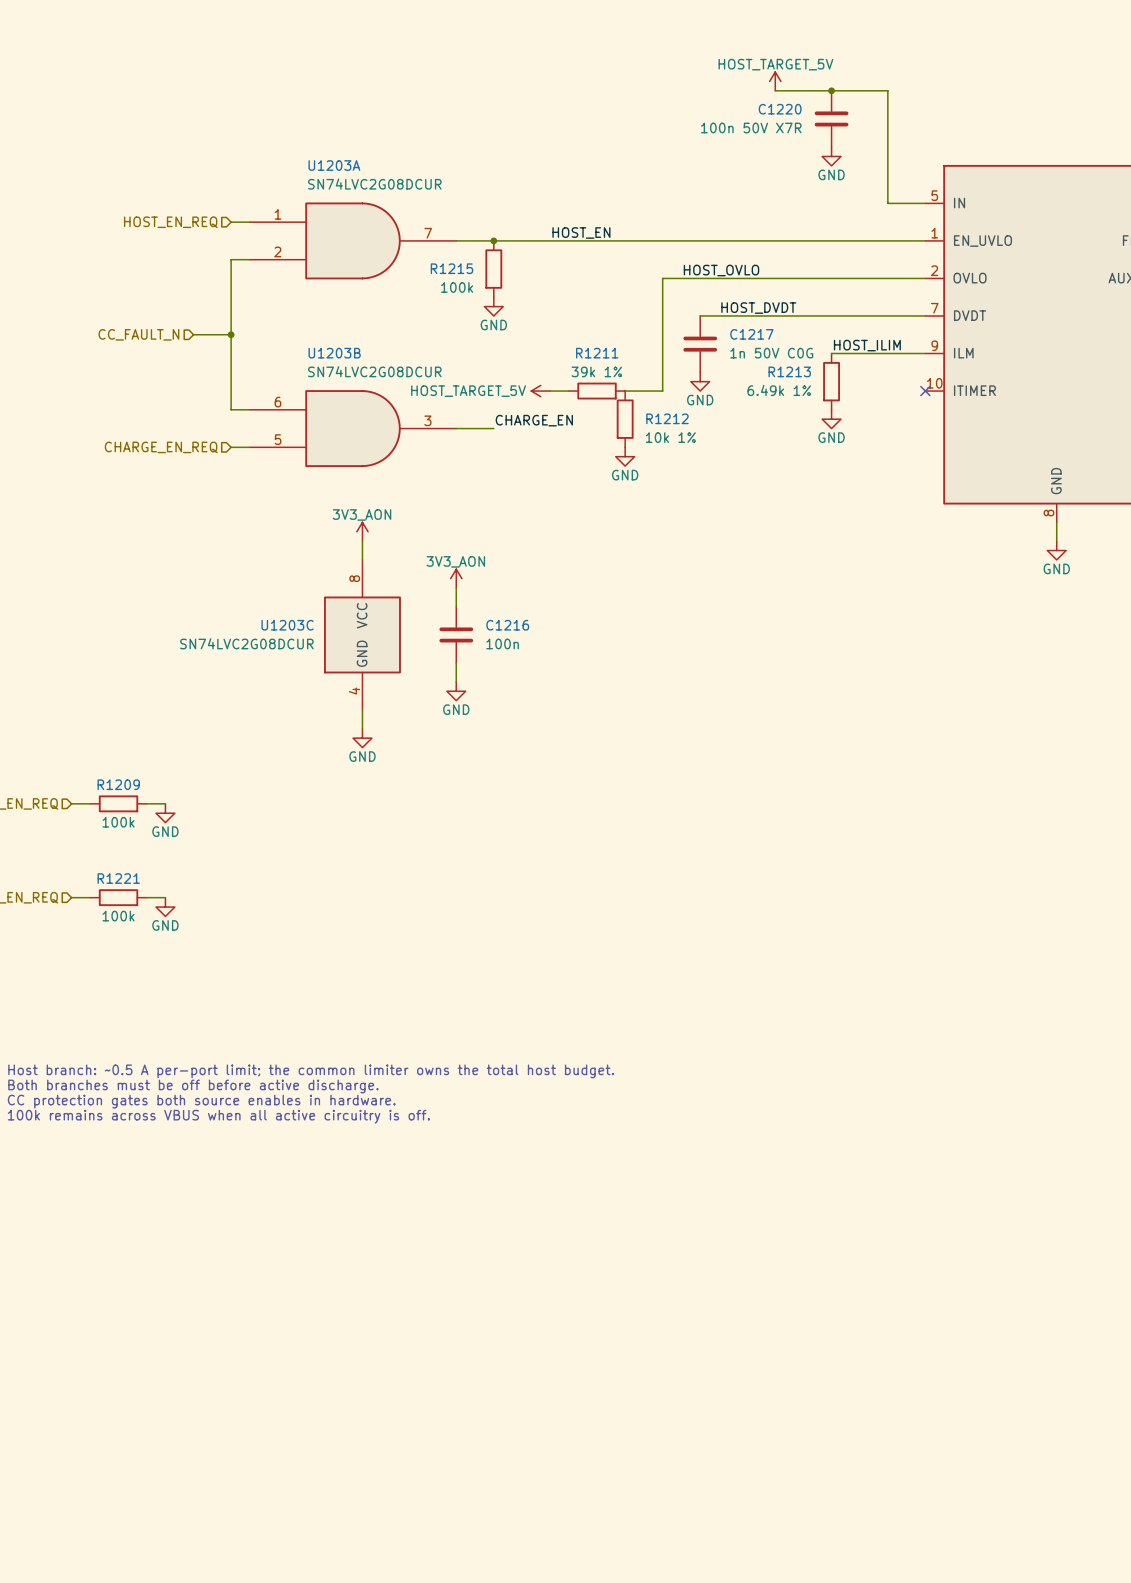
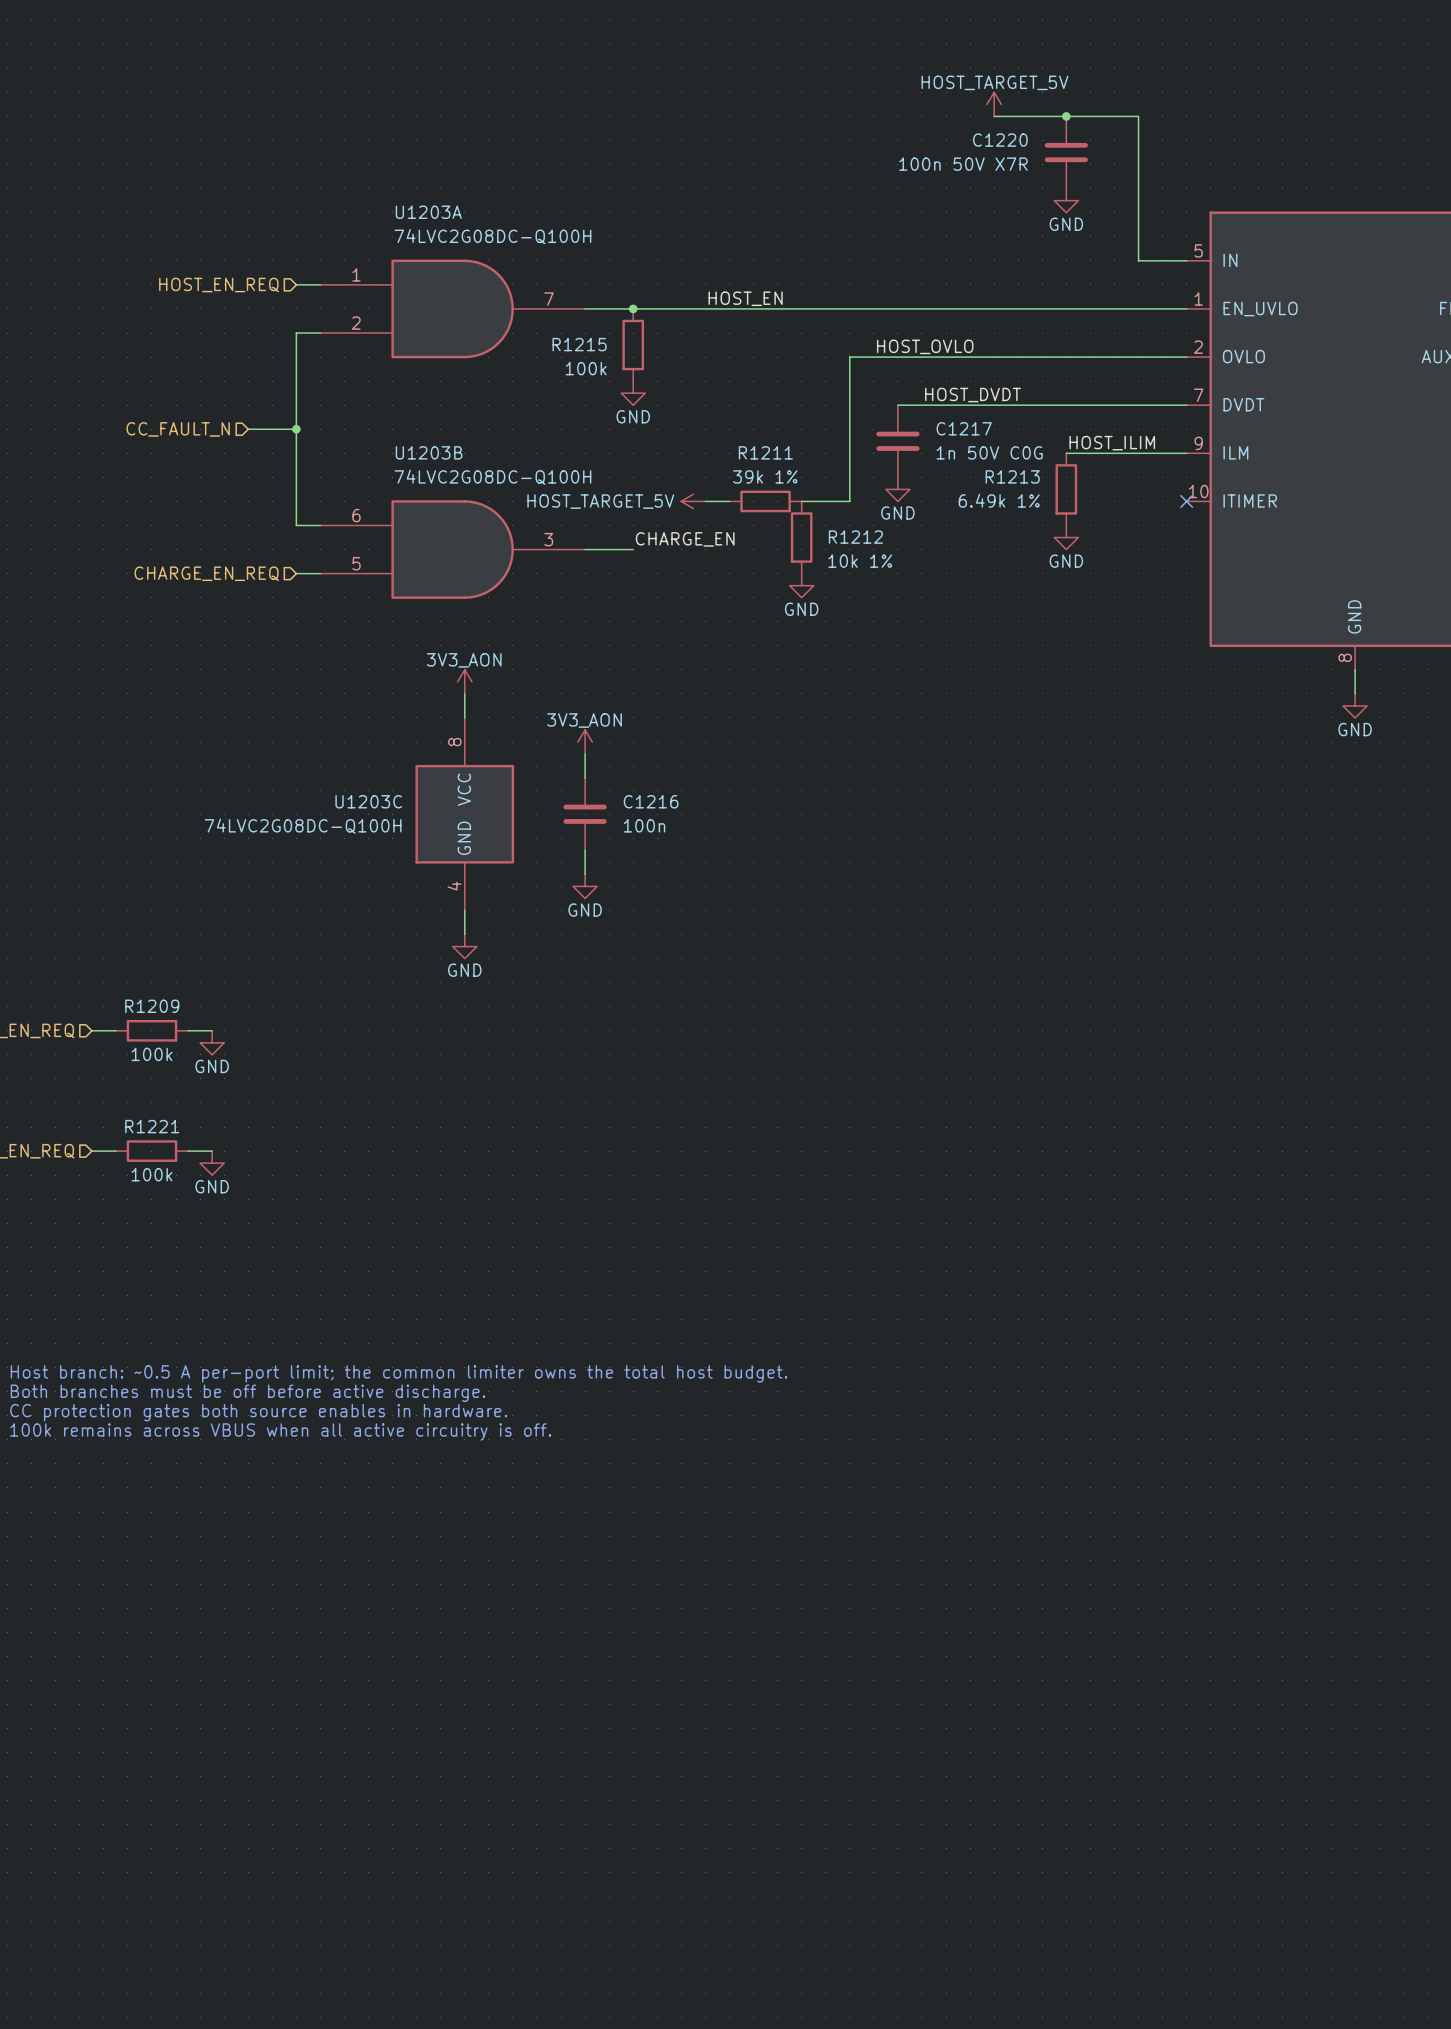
U1203A value: SN74LVC2G08DCUR (374, 184) -> 74LVC2G08DC-Q100H (492, 236)
U1203B value: SN74LVC2G08DCUR (374, 371) -> 74LVC2G08DC-Q100H (492, 477)
U1203C value: SN74LVC2G08DCUR (246, 643) -> 74LVC2G08DC-Q100H (303, 826)

